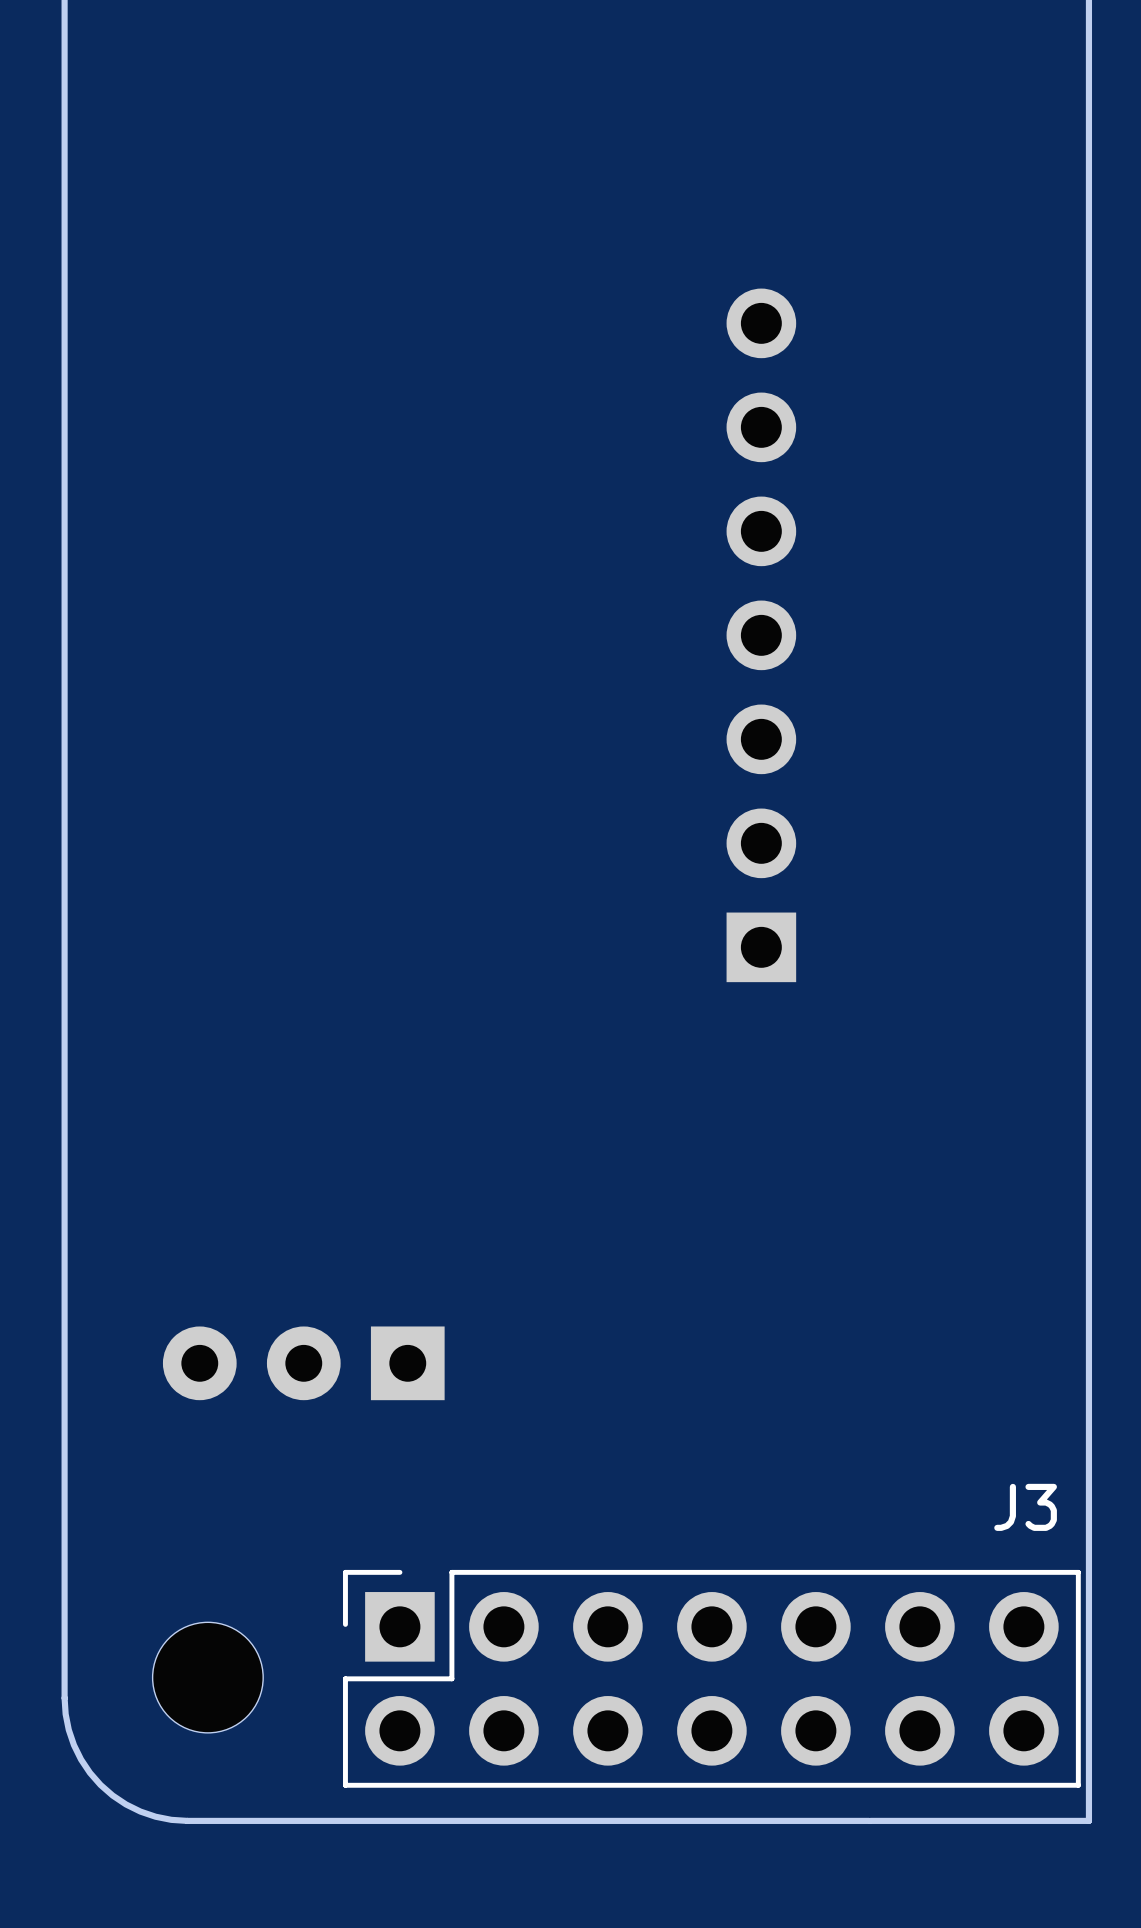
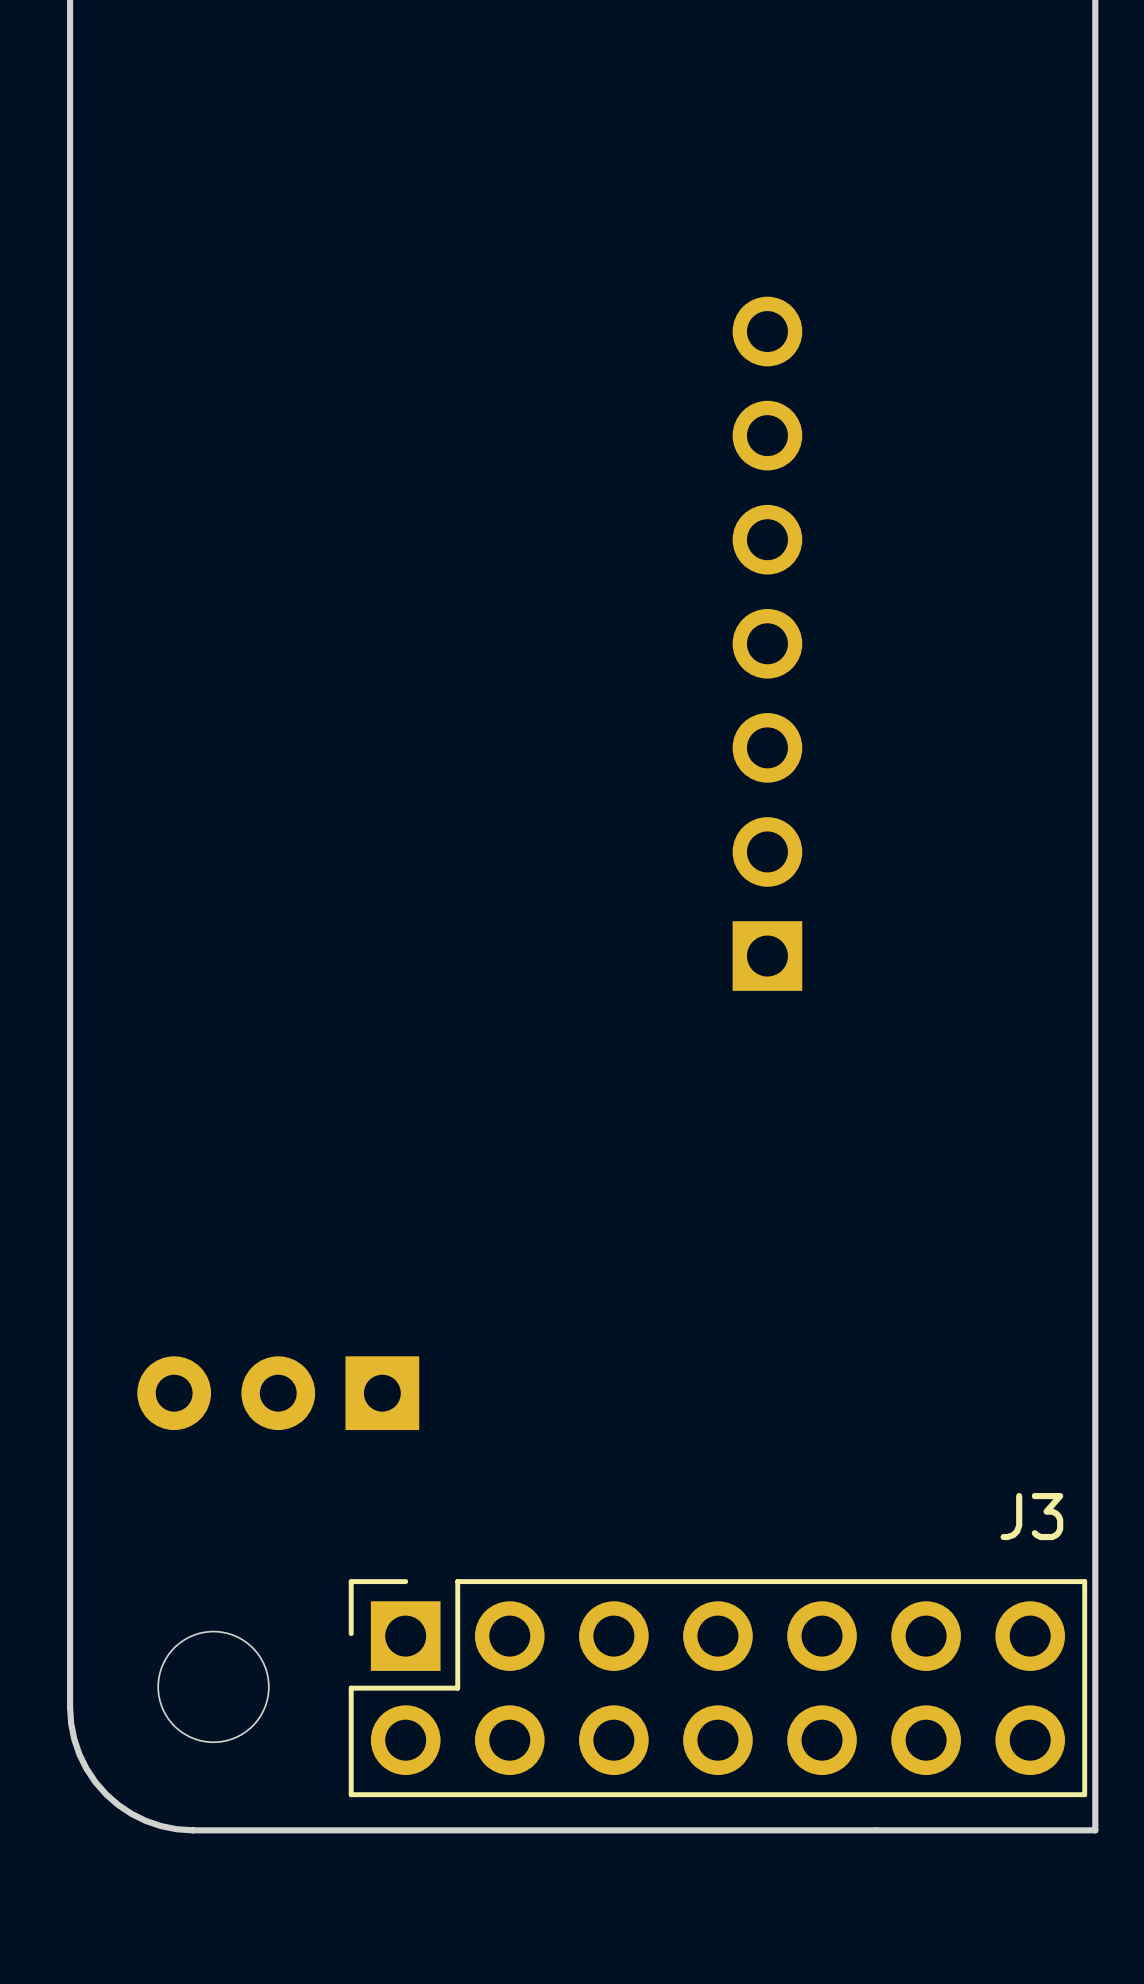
part position: (303, 1363) -> (278, 1393)

